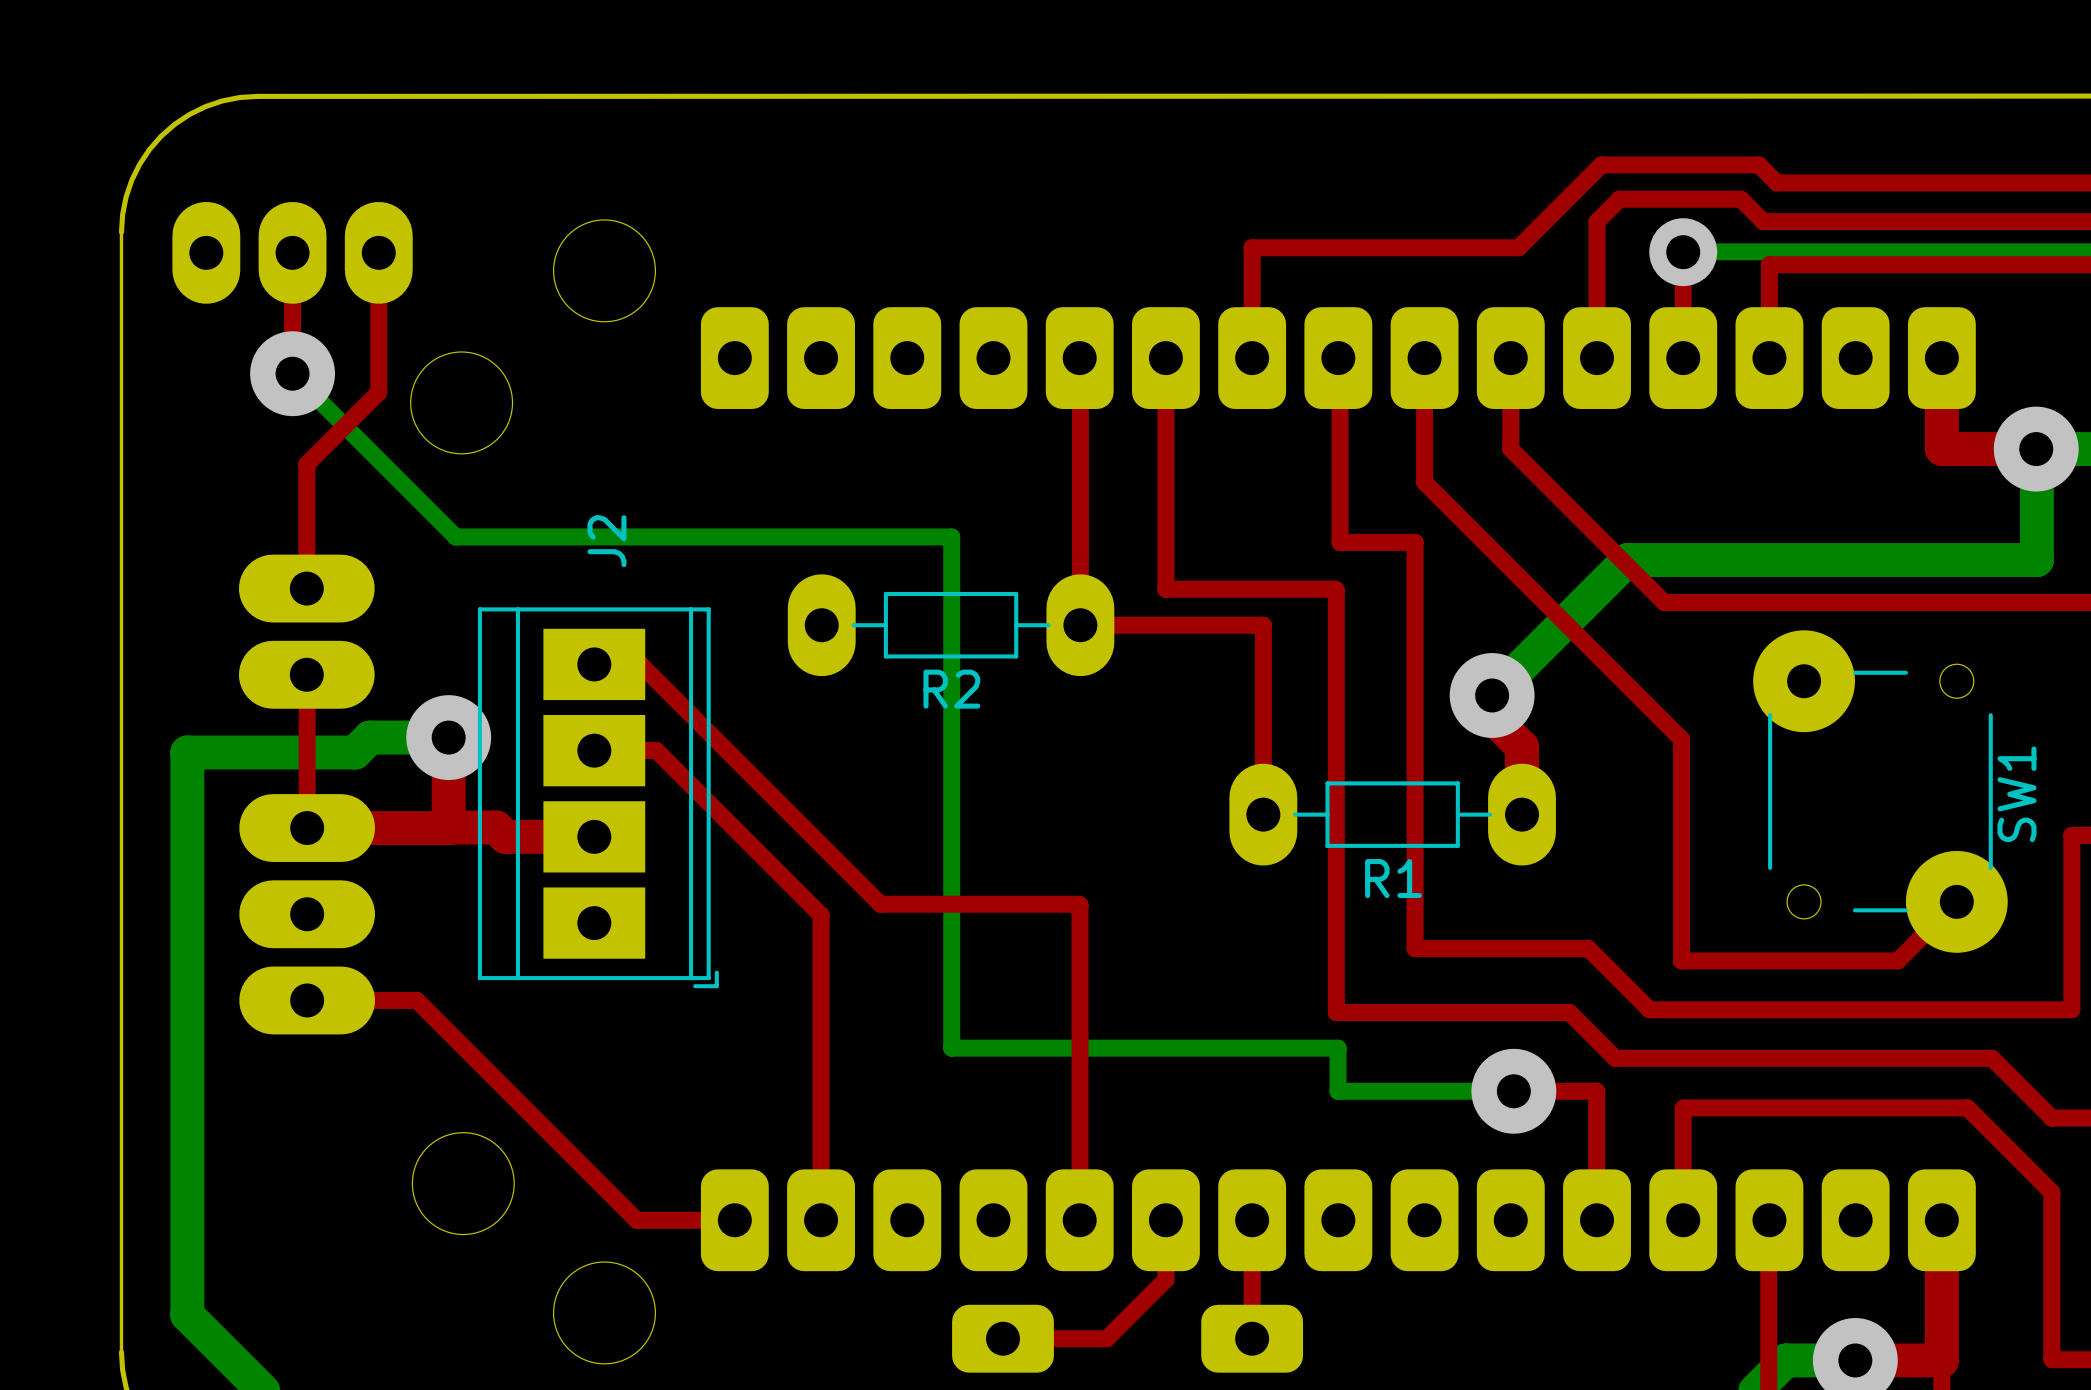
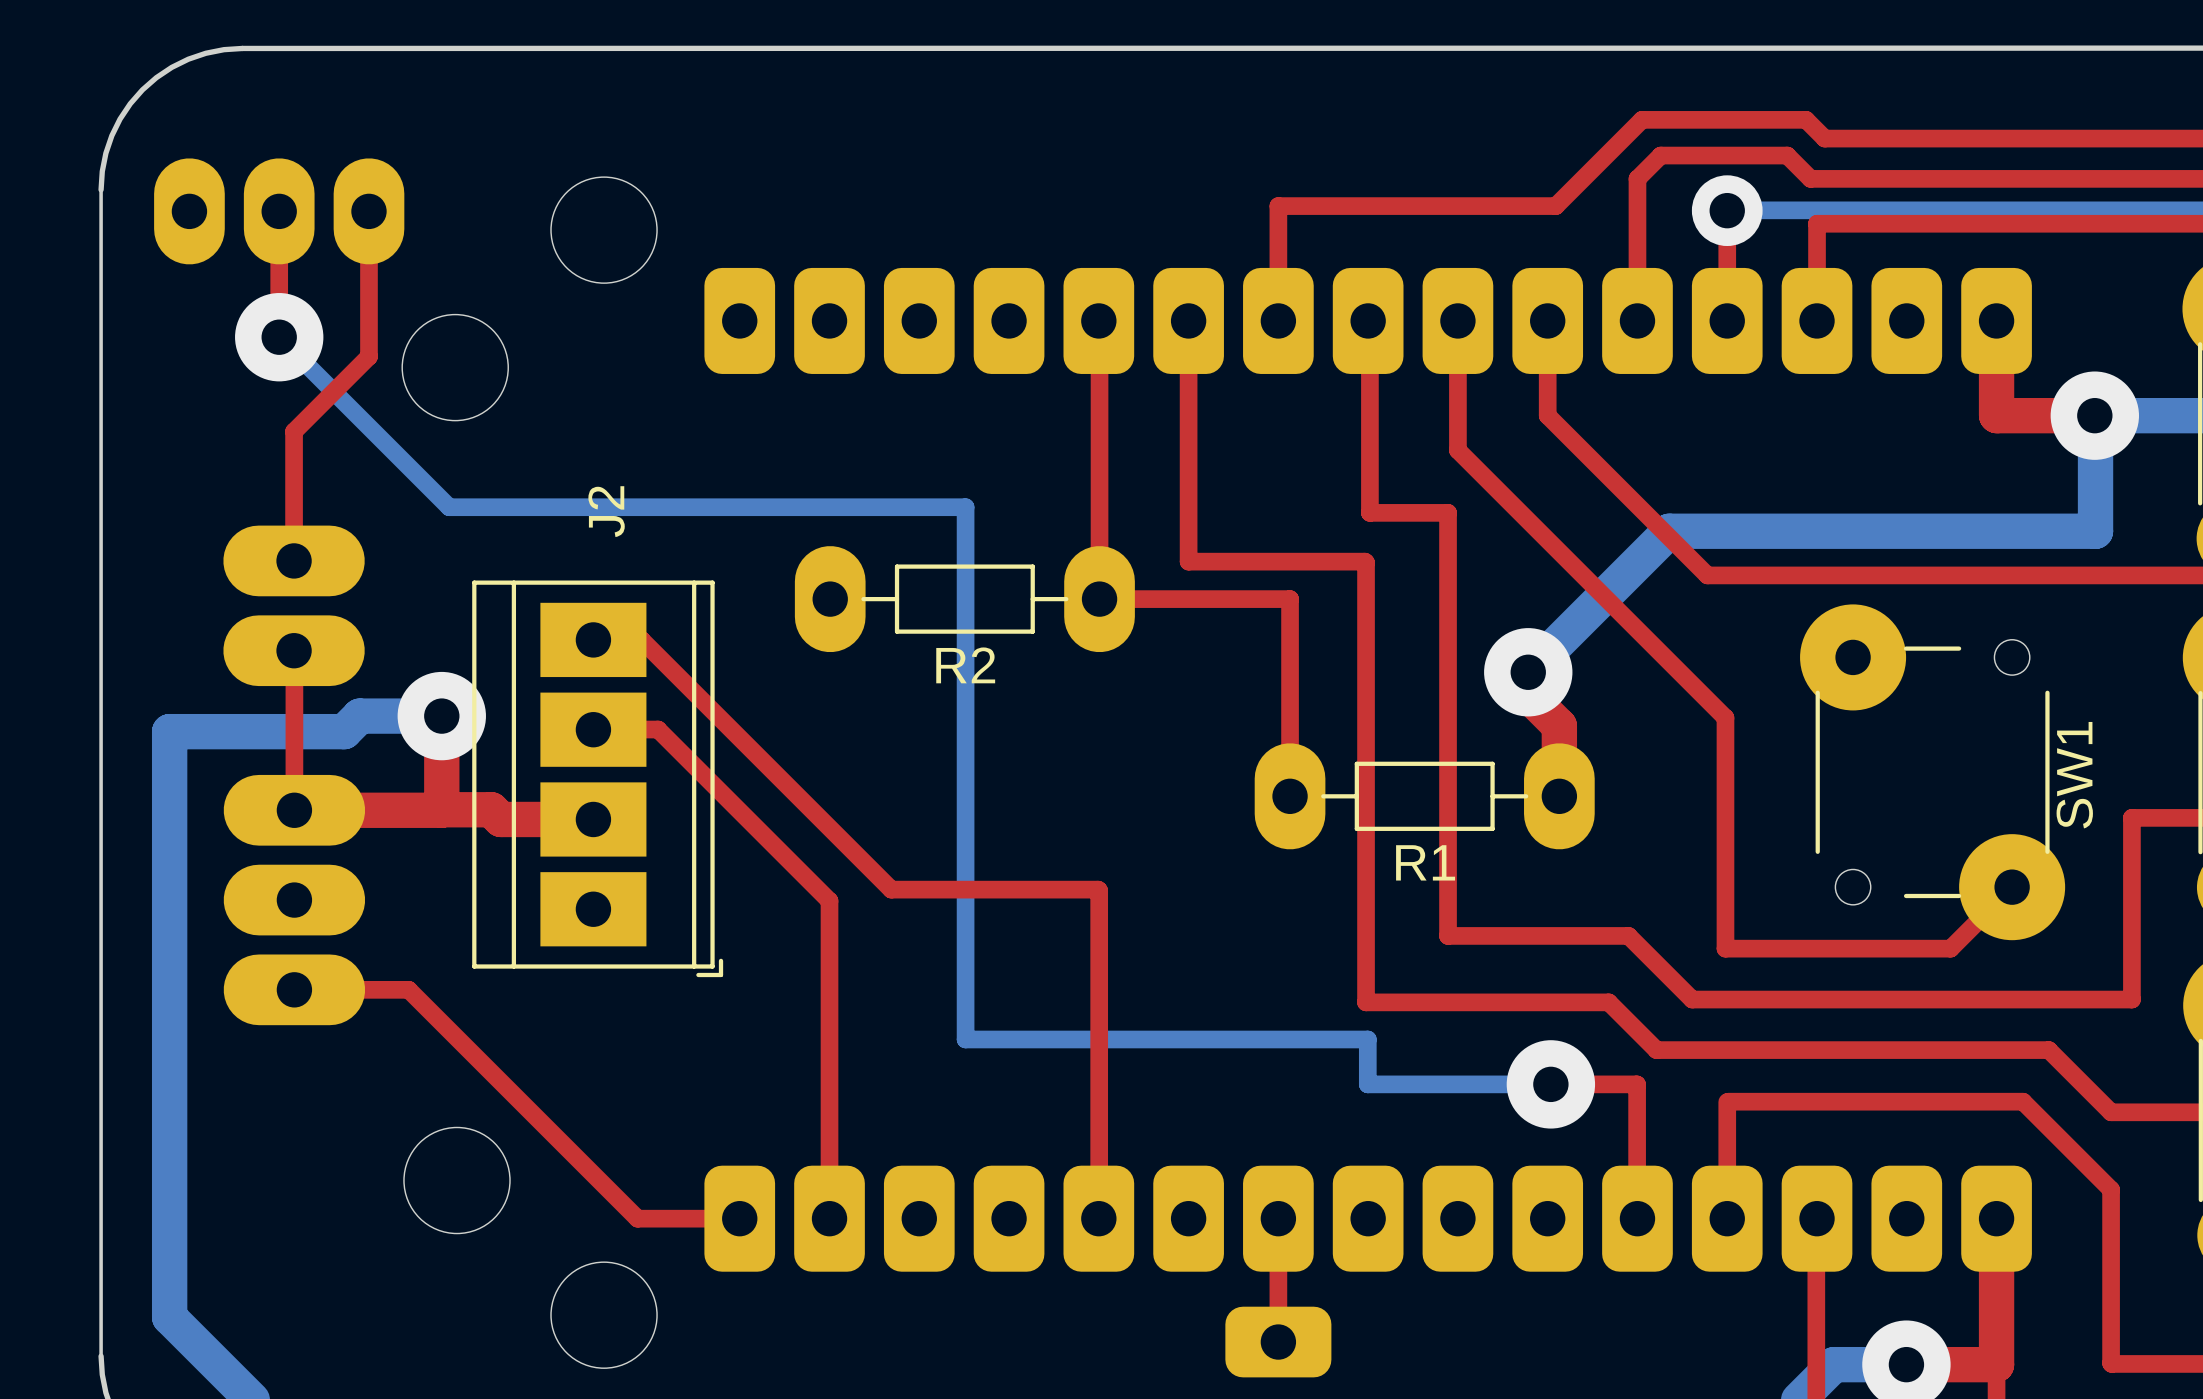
top track: (1165, 1220) (1165, 1279) (1106, 1338) (1003, 1338) -> none
part: (1003, 1338) -> none

